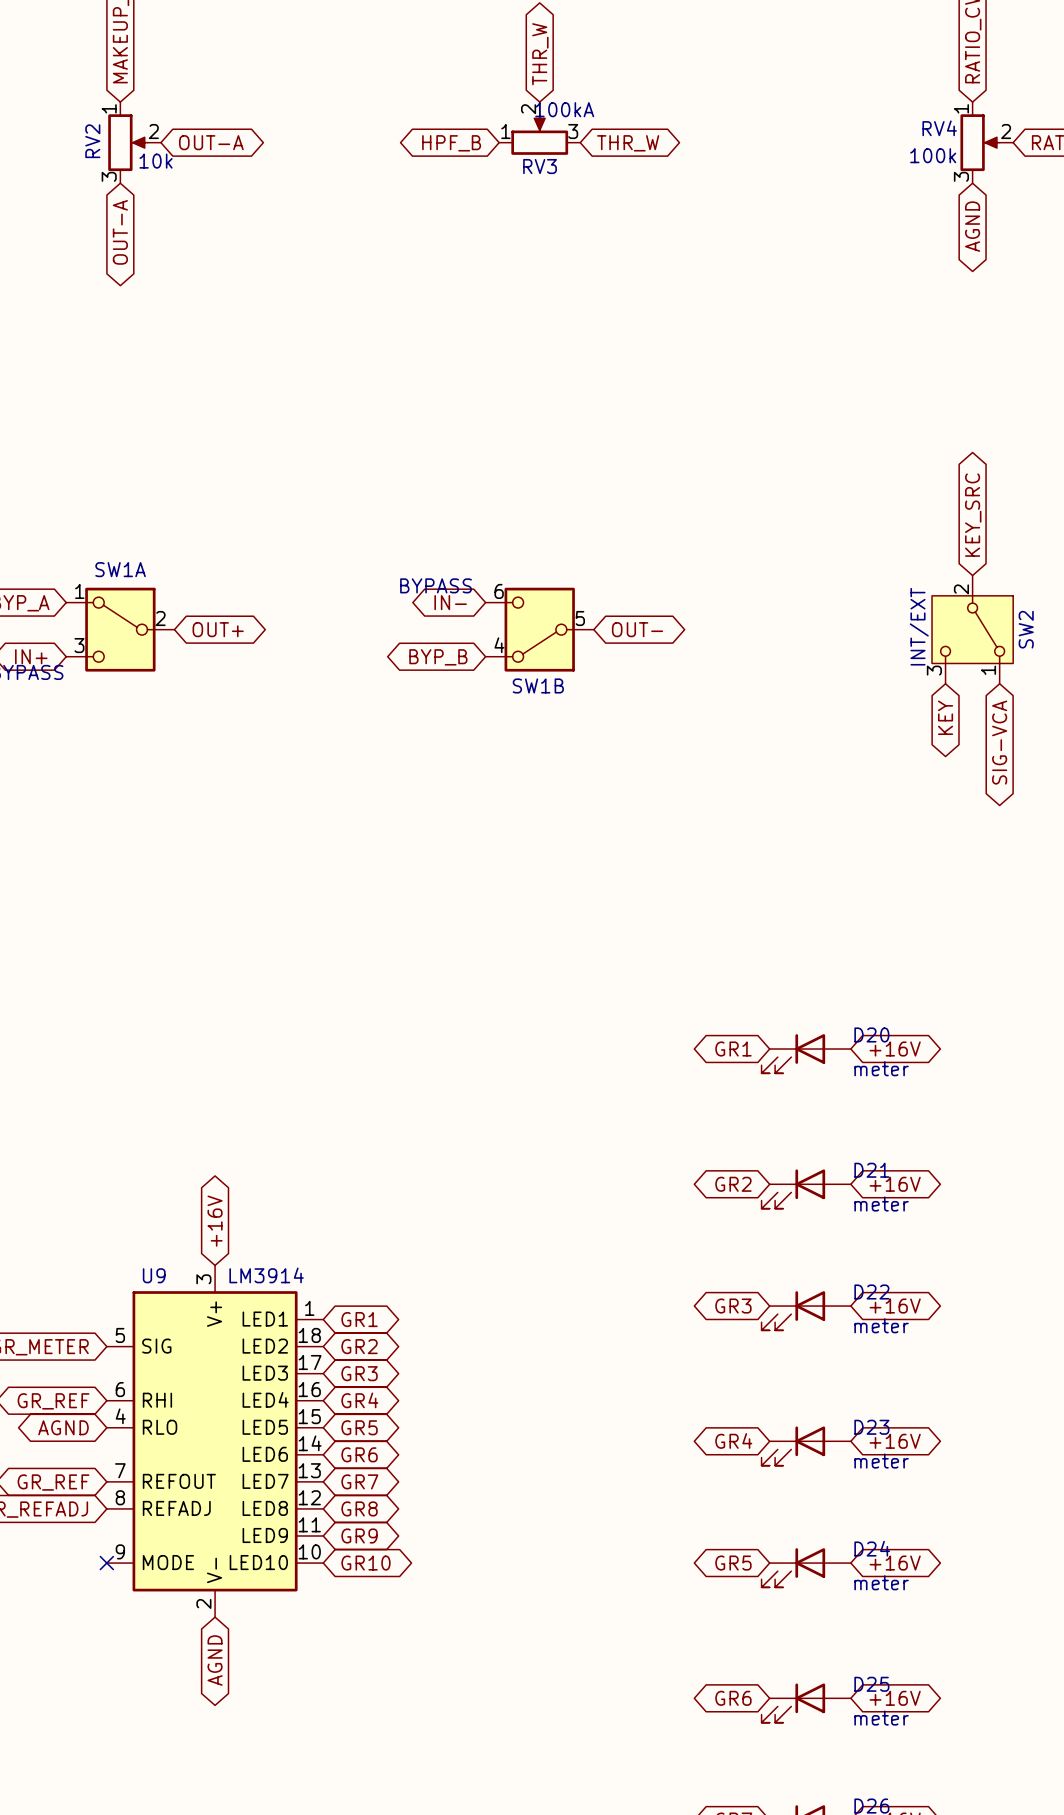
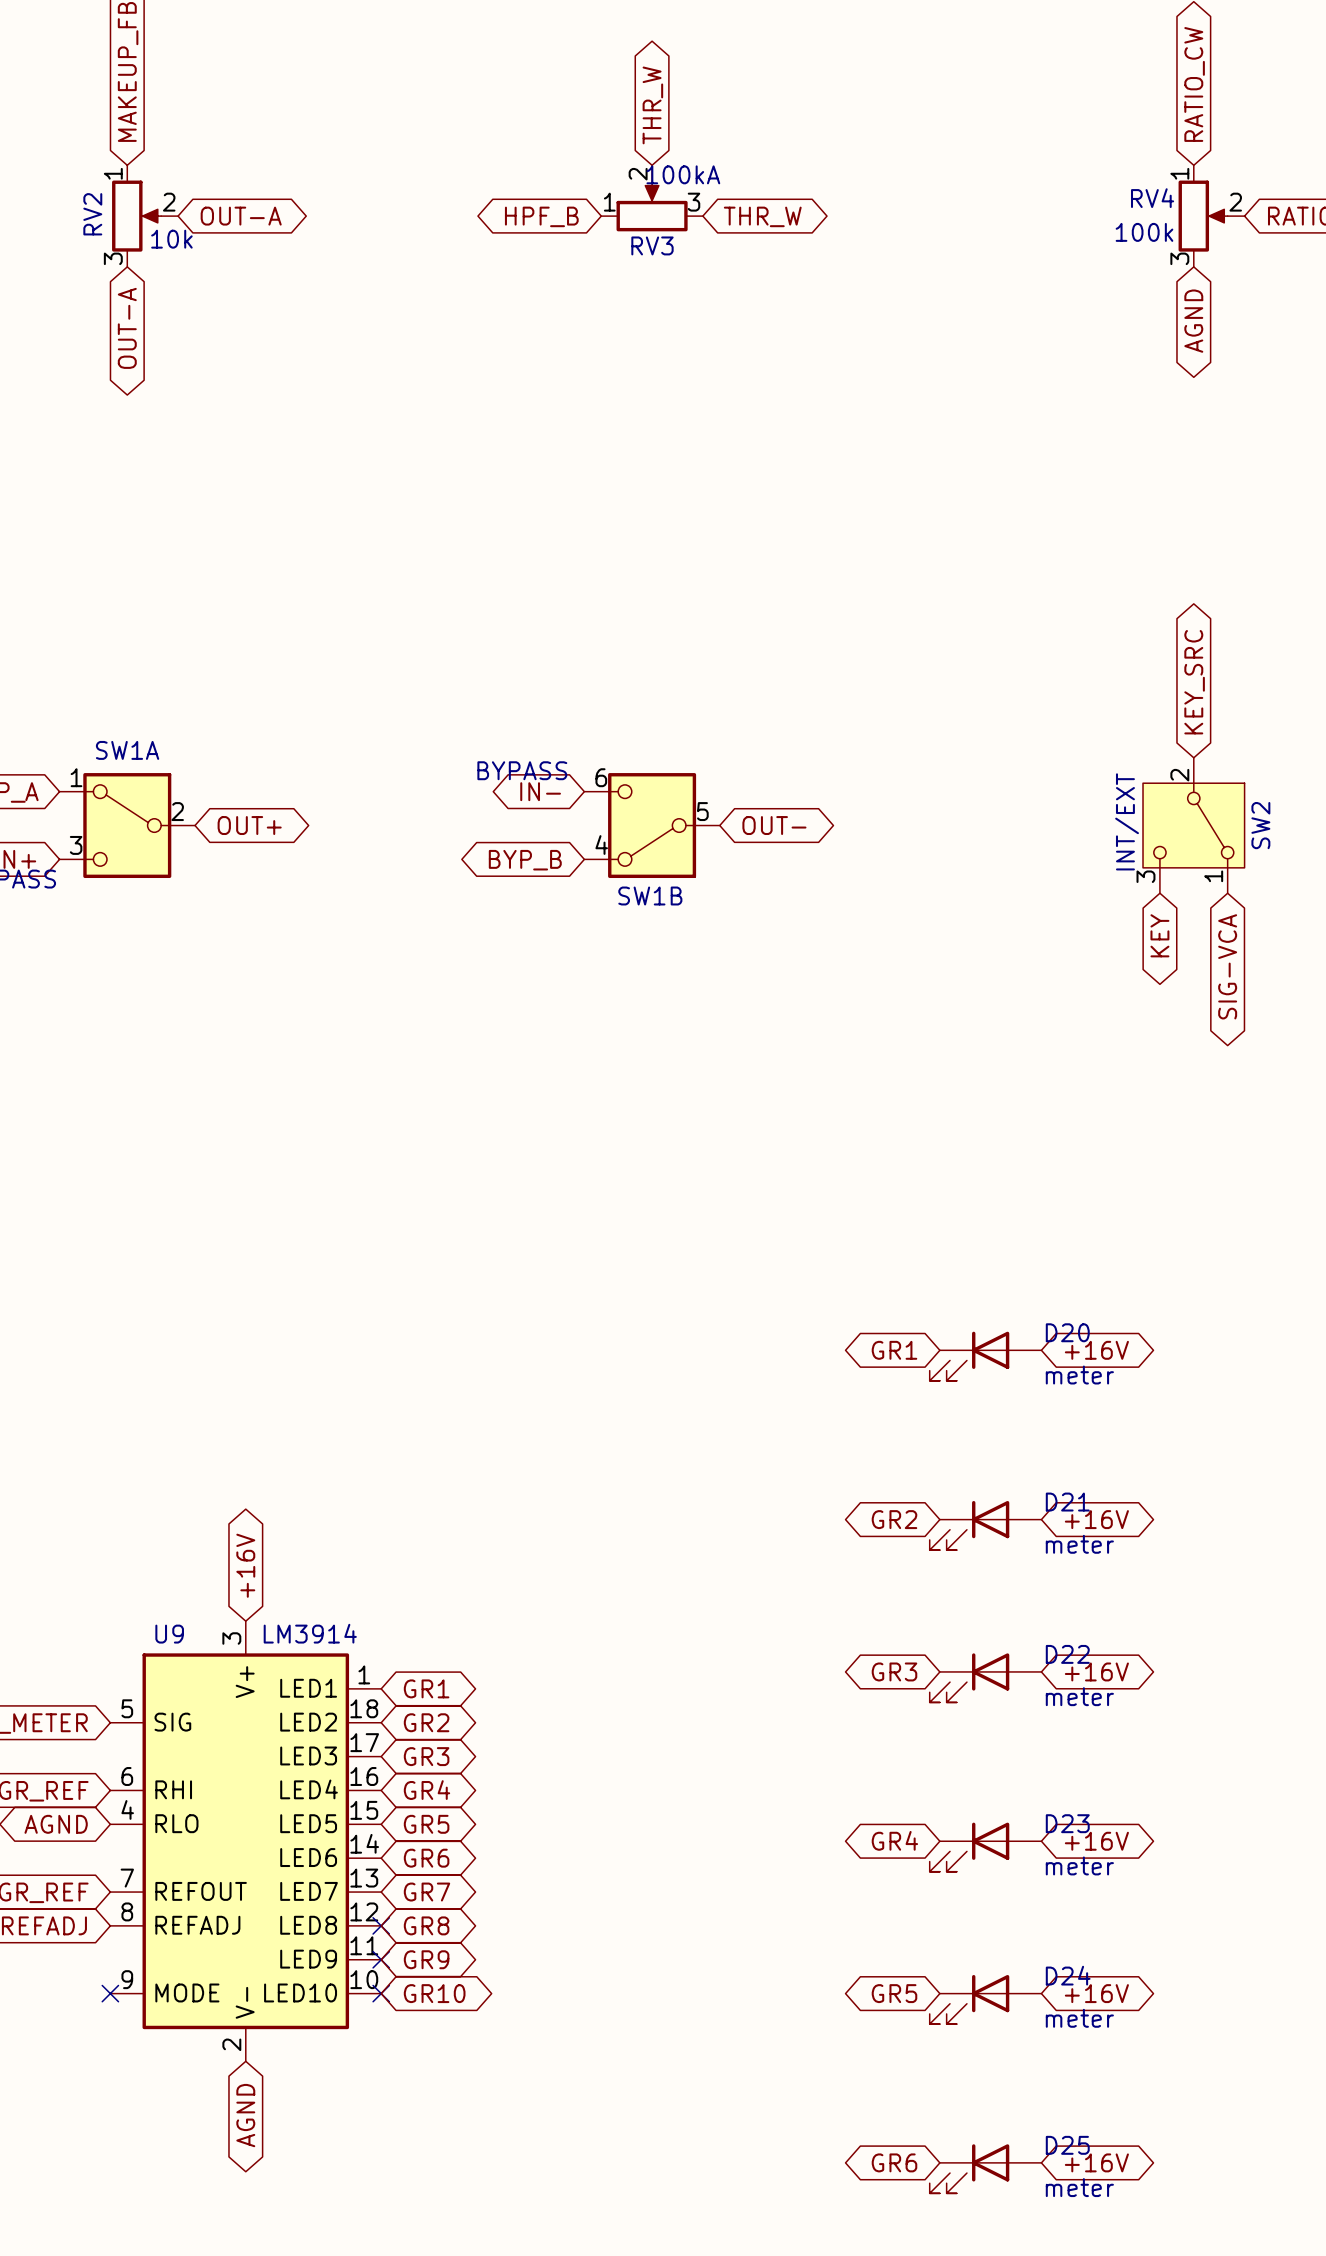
no-connect mark: none -> (381, 1925)
no-connect mark: none -> (381, 1959)
no-connect mark: none -> (381, 1993)

